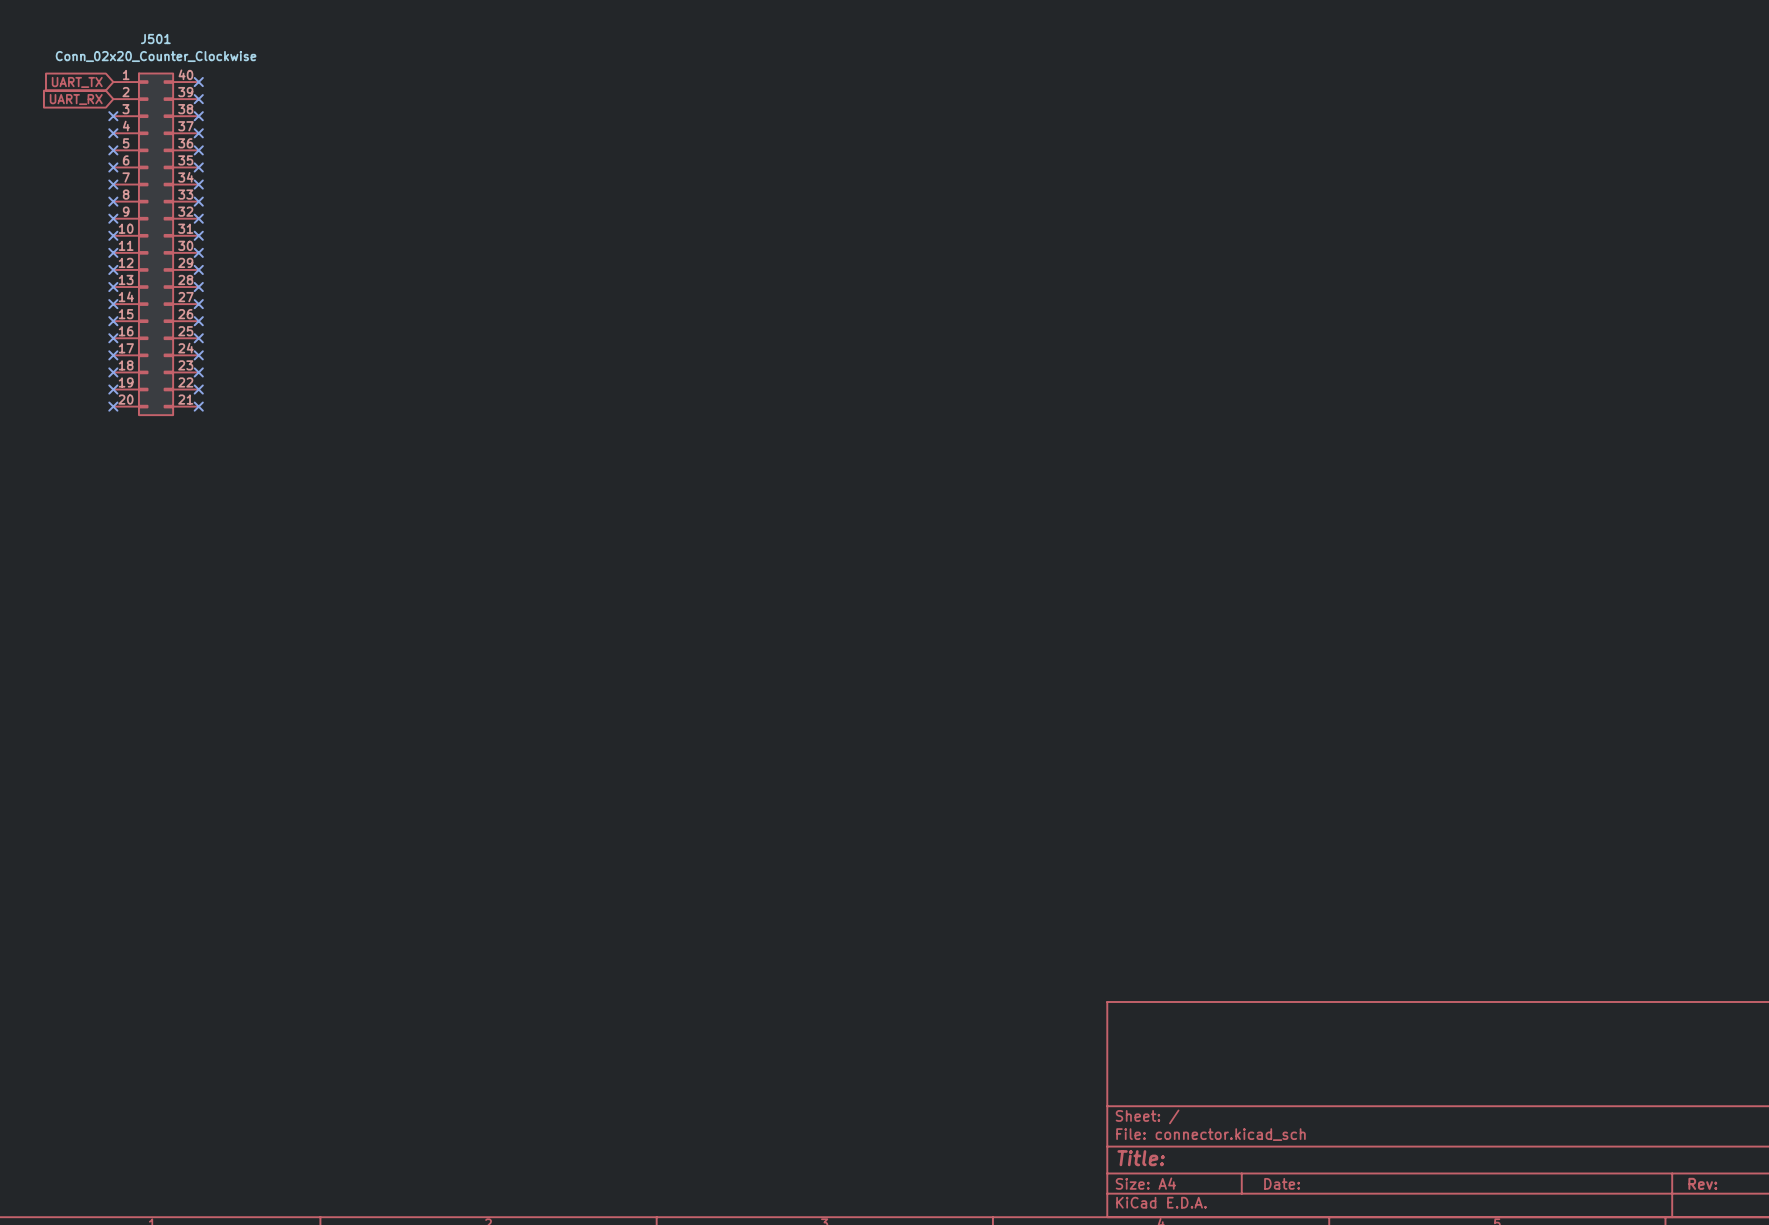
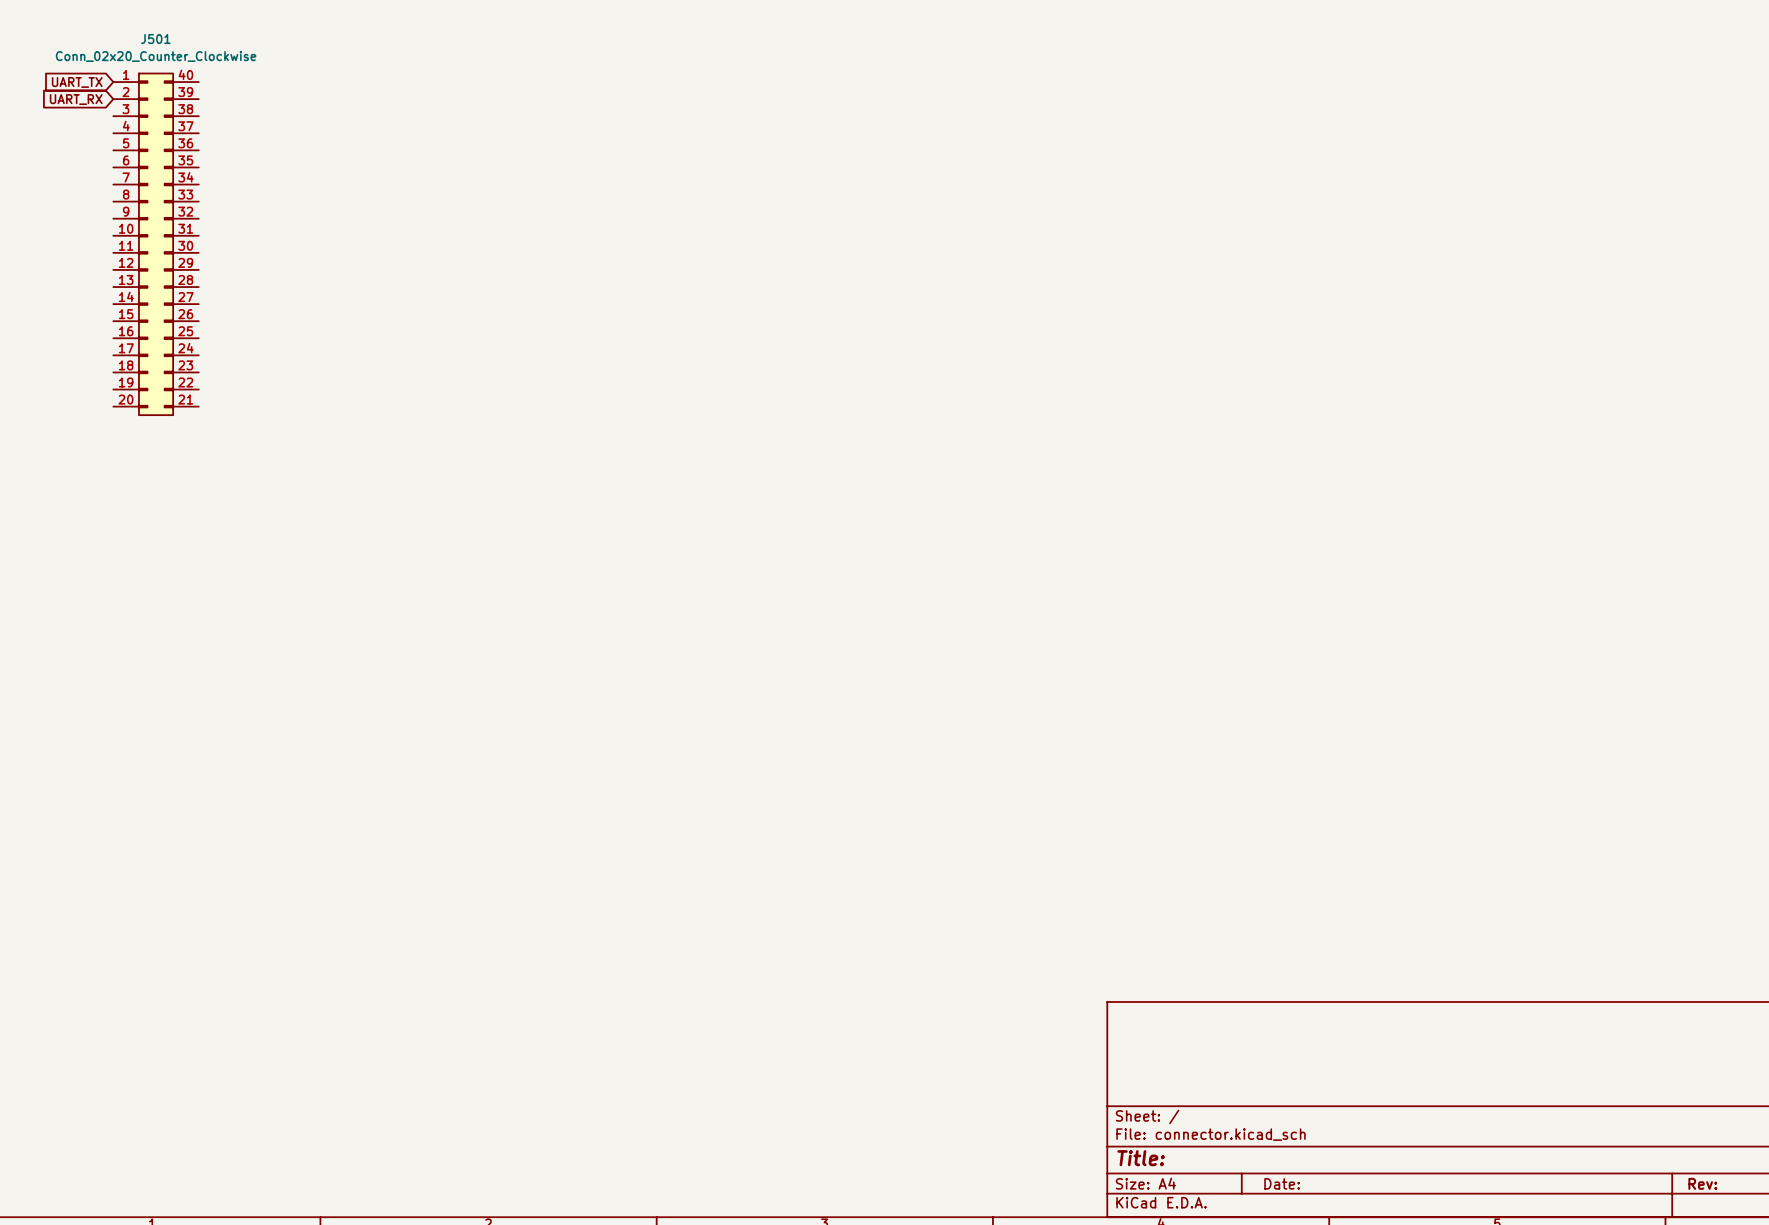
no-connect mark: (198, 82) -> none
no-connect mark: (198, 99) -> none
no-connect mark: (113, 116) -> none
no-connect mark: (198, 116) -> none
no-connect mark: (113, 133) -> none
no-connect mark: (198, 133) -> none
no-connect mark: (113, 150) -> none
no-connect mark: (198, 150) -> none
no-connect mark: (113, 167) -> none
no-connect mark: (198, 167) -> none
no-connect mark: (113, 184) -> none
no-connect mark: (198, 184) -> none
no-connect mark: (113, 201) -> none
no-connect mark: (198, 201) -> none
no-connect mark: (113, 218) -> none
no-connect mark: (198, 218) -> none
no-connect mark: (113, 235) -> none
no-connect mark: (198, 235) -> none
no-connect mark: (113, 252) -> none
no-connect mark: (198, 252) -> none
no-connect mark: (113, 269) -> none
no-connect mark: (198, 269) -> none
no-connect mark: (113, 287) -> none
no-connect mark: (198, 287) -> none
no-connect mark: (113, 304) -> none
no-connect mark: (198, 304) -> none
no-connect mark: (113, 321) -> none
no-connect mark: (198, 321) -> none
no-connect mark: (113, 338) -> none
no-connect mark: (198, 338) -> none
no-connect mark: (113, 355) -> none
no-connect mark: (198, 355) -> none
no-connect mark: (113, 372) -> none
no-connect mark: (198, 372) -> none
no-connect mark: (113, 389) -> none
no-connect mark: (198, 389) -> none
no-connect mark: (113, 406) -> none
no-connect mark: (198, 406) -> none

